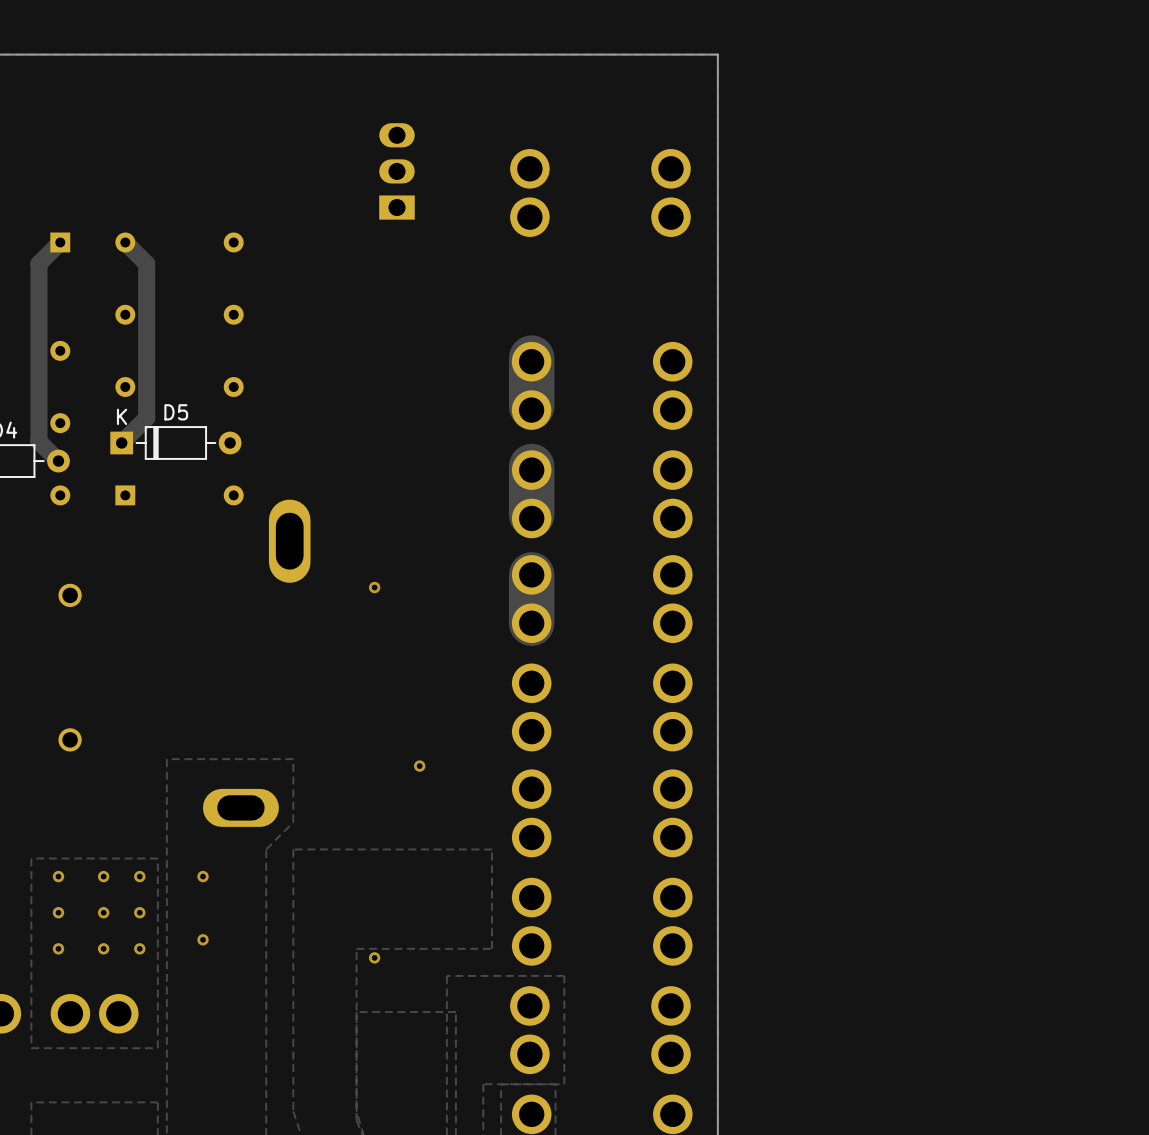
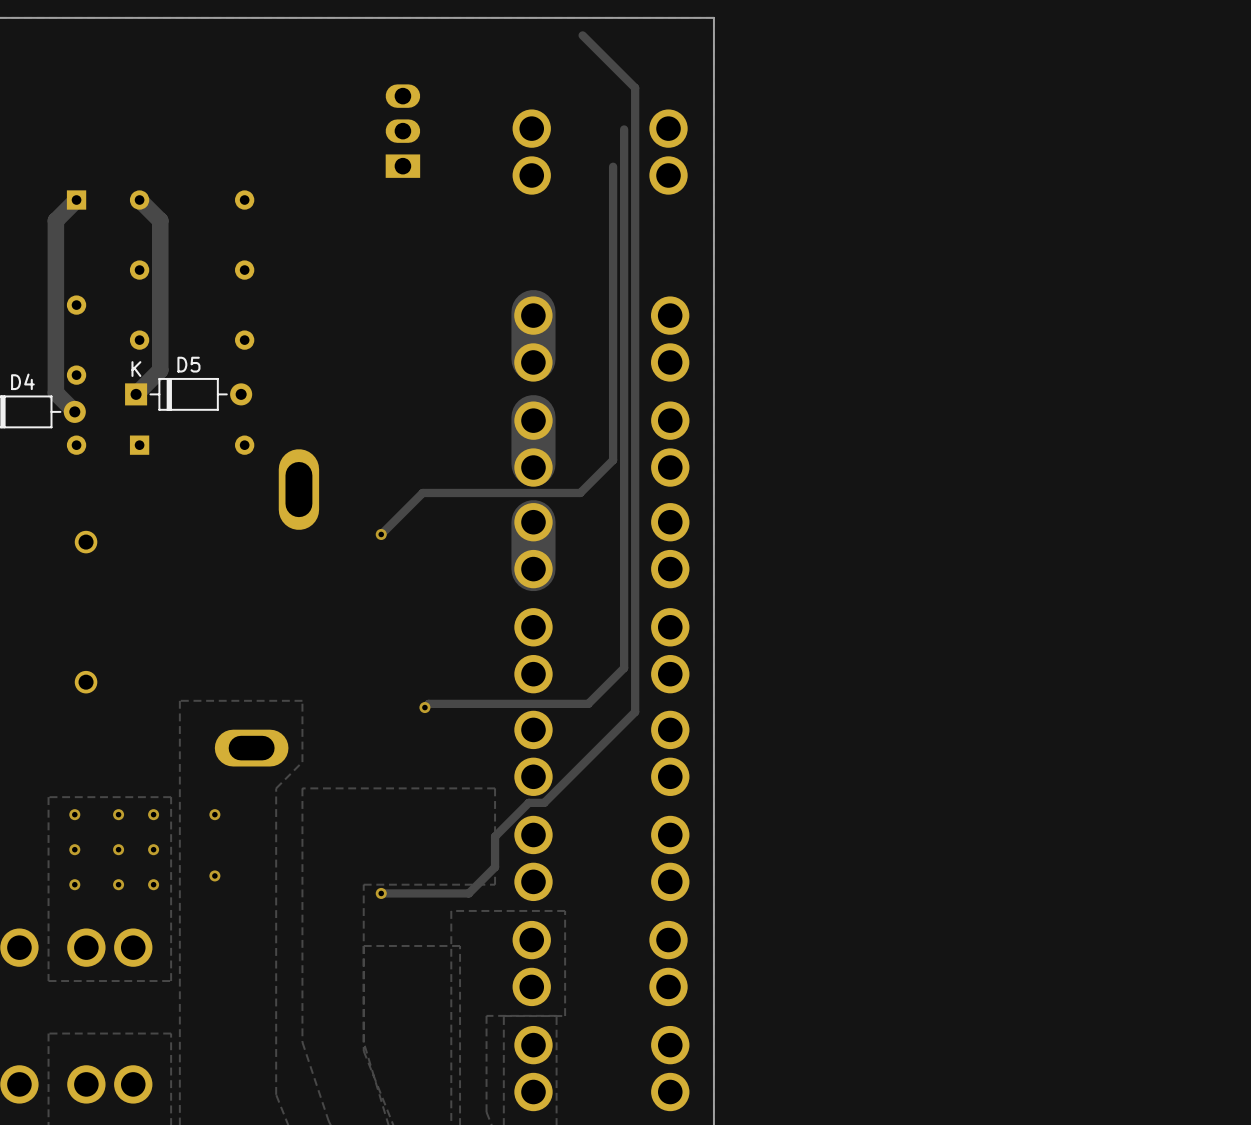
track: none -> (582, 35) (635, 87) (635, 711) (544, 802) (528, 802) (495, 836) (495, 867) (468, 893) (381, 893)
track: none -> (624, 129) (624, 668) (588, 703) (428, 703) (424, 707)
track: none -> (613, 166) (613, 460) (580, 492) (422, 492) (381, 534)

